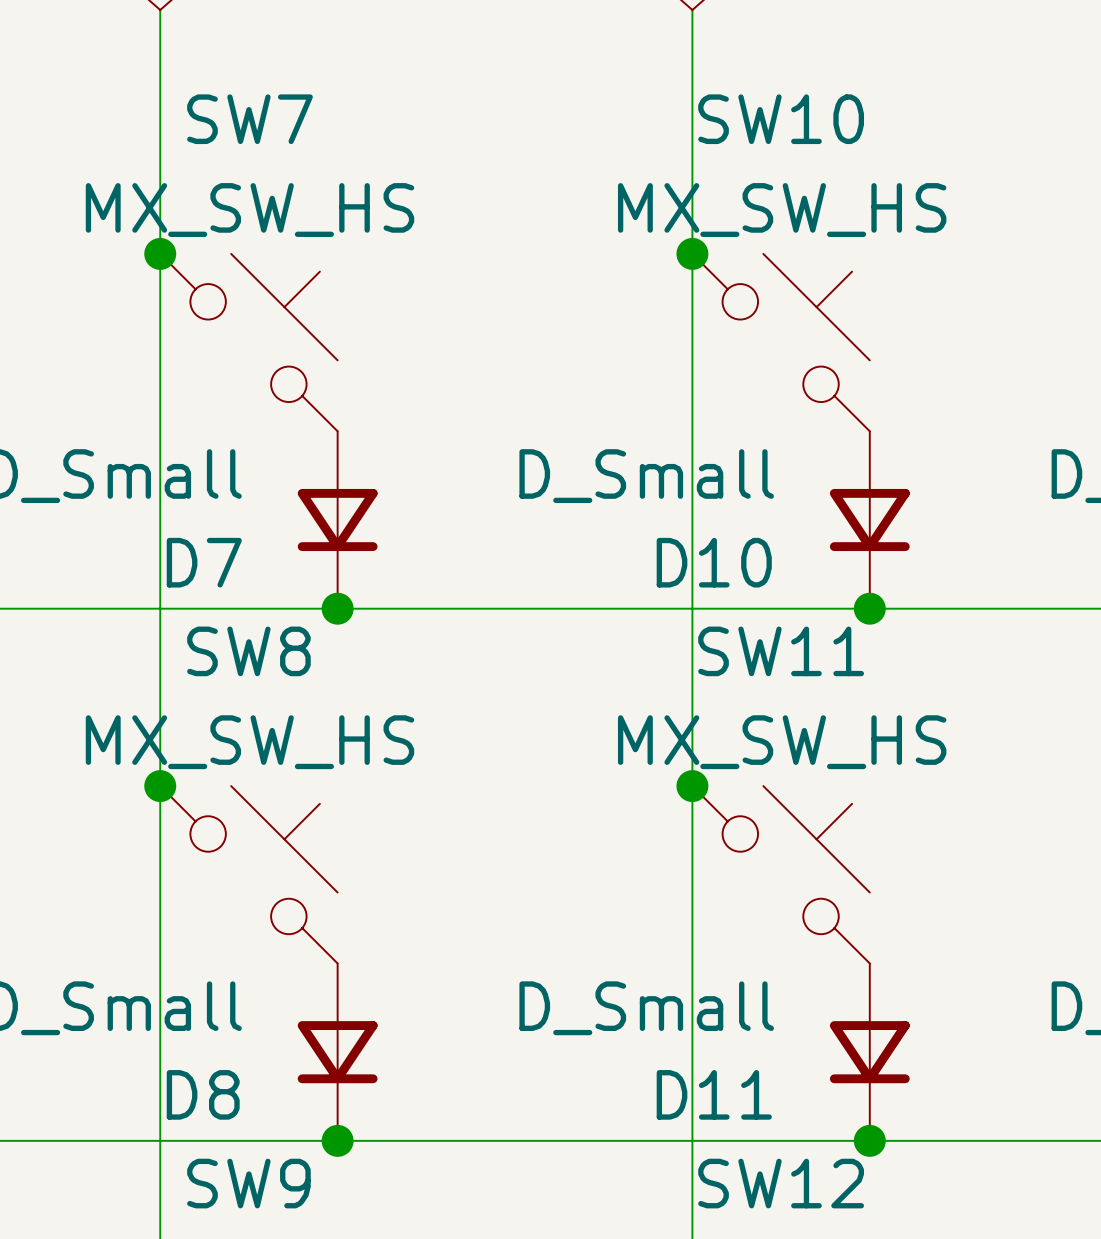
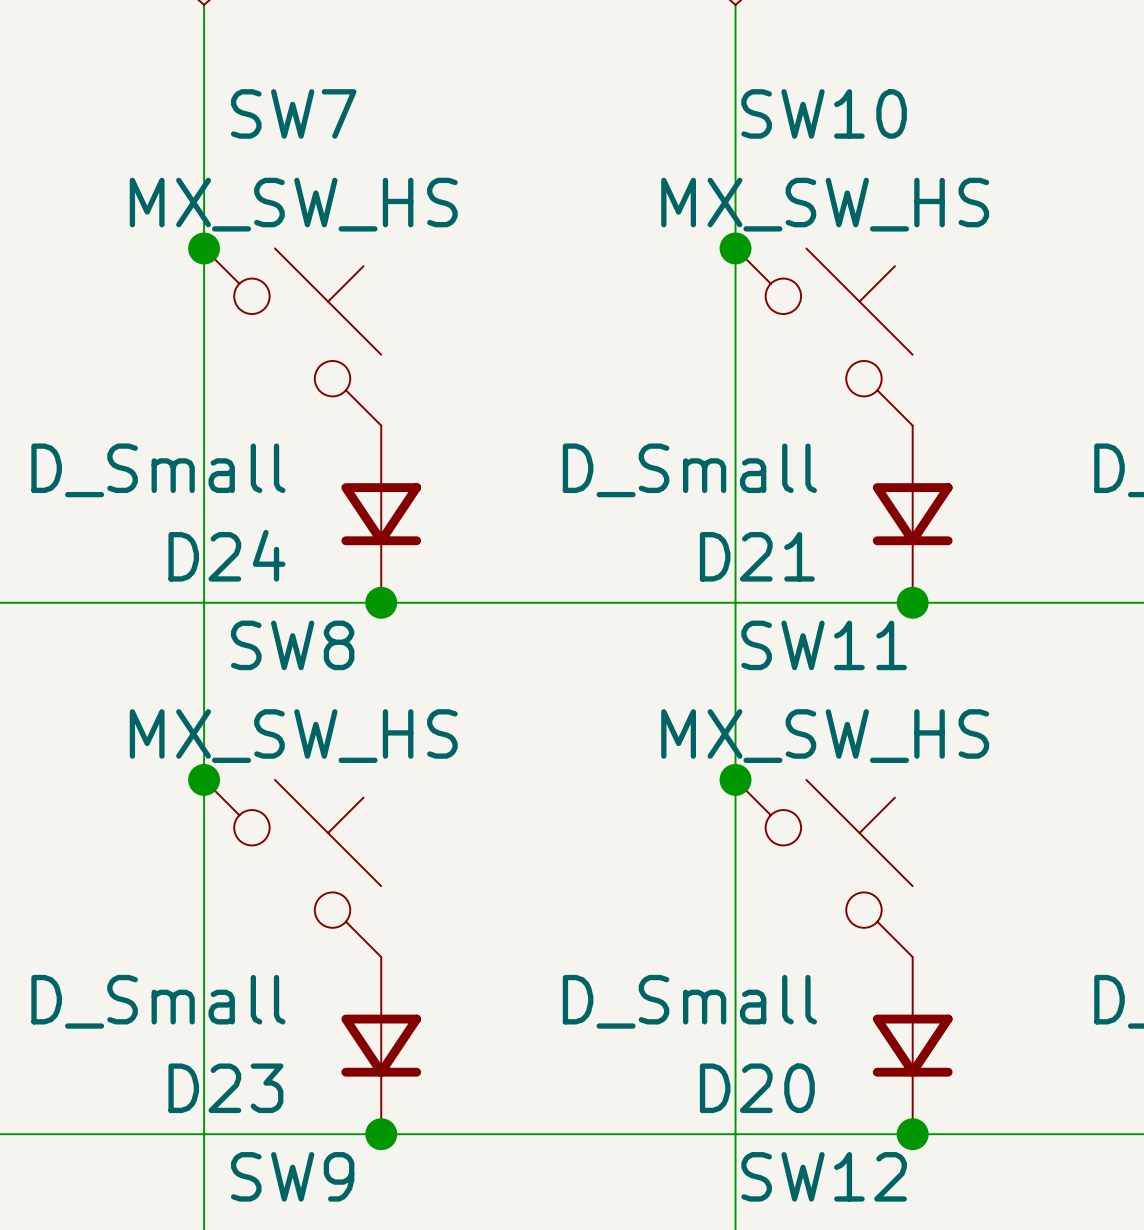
D7 name: D7 (204, 562) -> D24 (226, 555)
D10 name: D10 (714, 562) -> D21 (757, 556)
D8 name: D8 (203, 1094) -> D23 (225, 1088)
D11 name: D11 (714, 1094) -> D20 (757, 1088)

